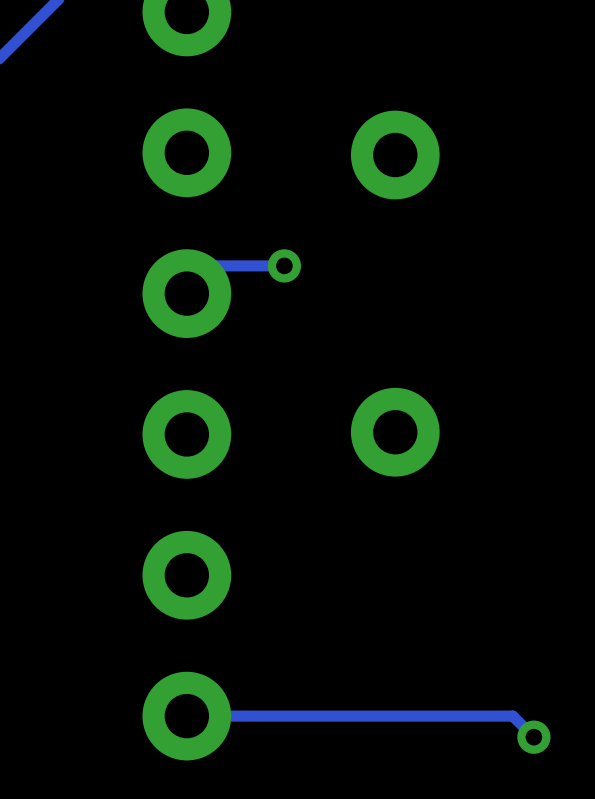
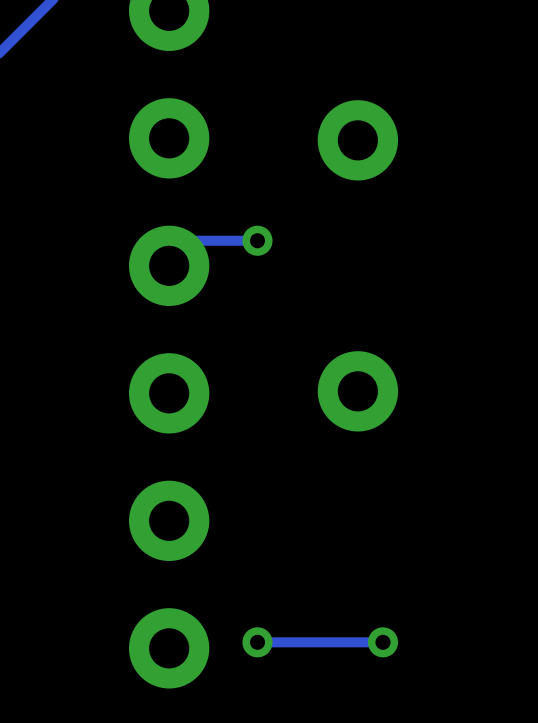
via: none -> (257, 642)
track: none -> (383, 642) (257, 642)
track: (186, 716) (512, 716) (533, 737) -> none
via position: (533, 737) -> (383, 642)

